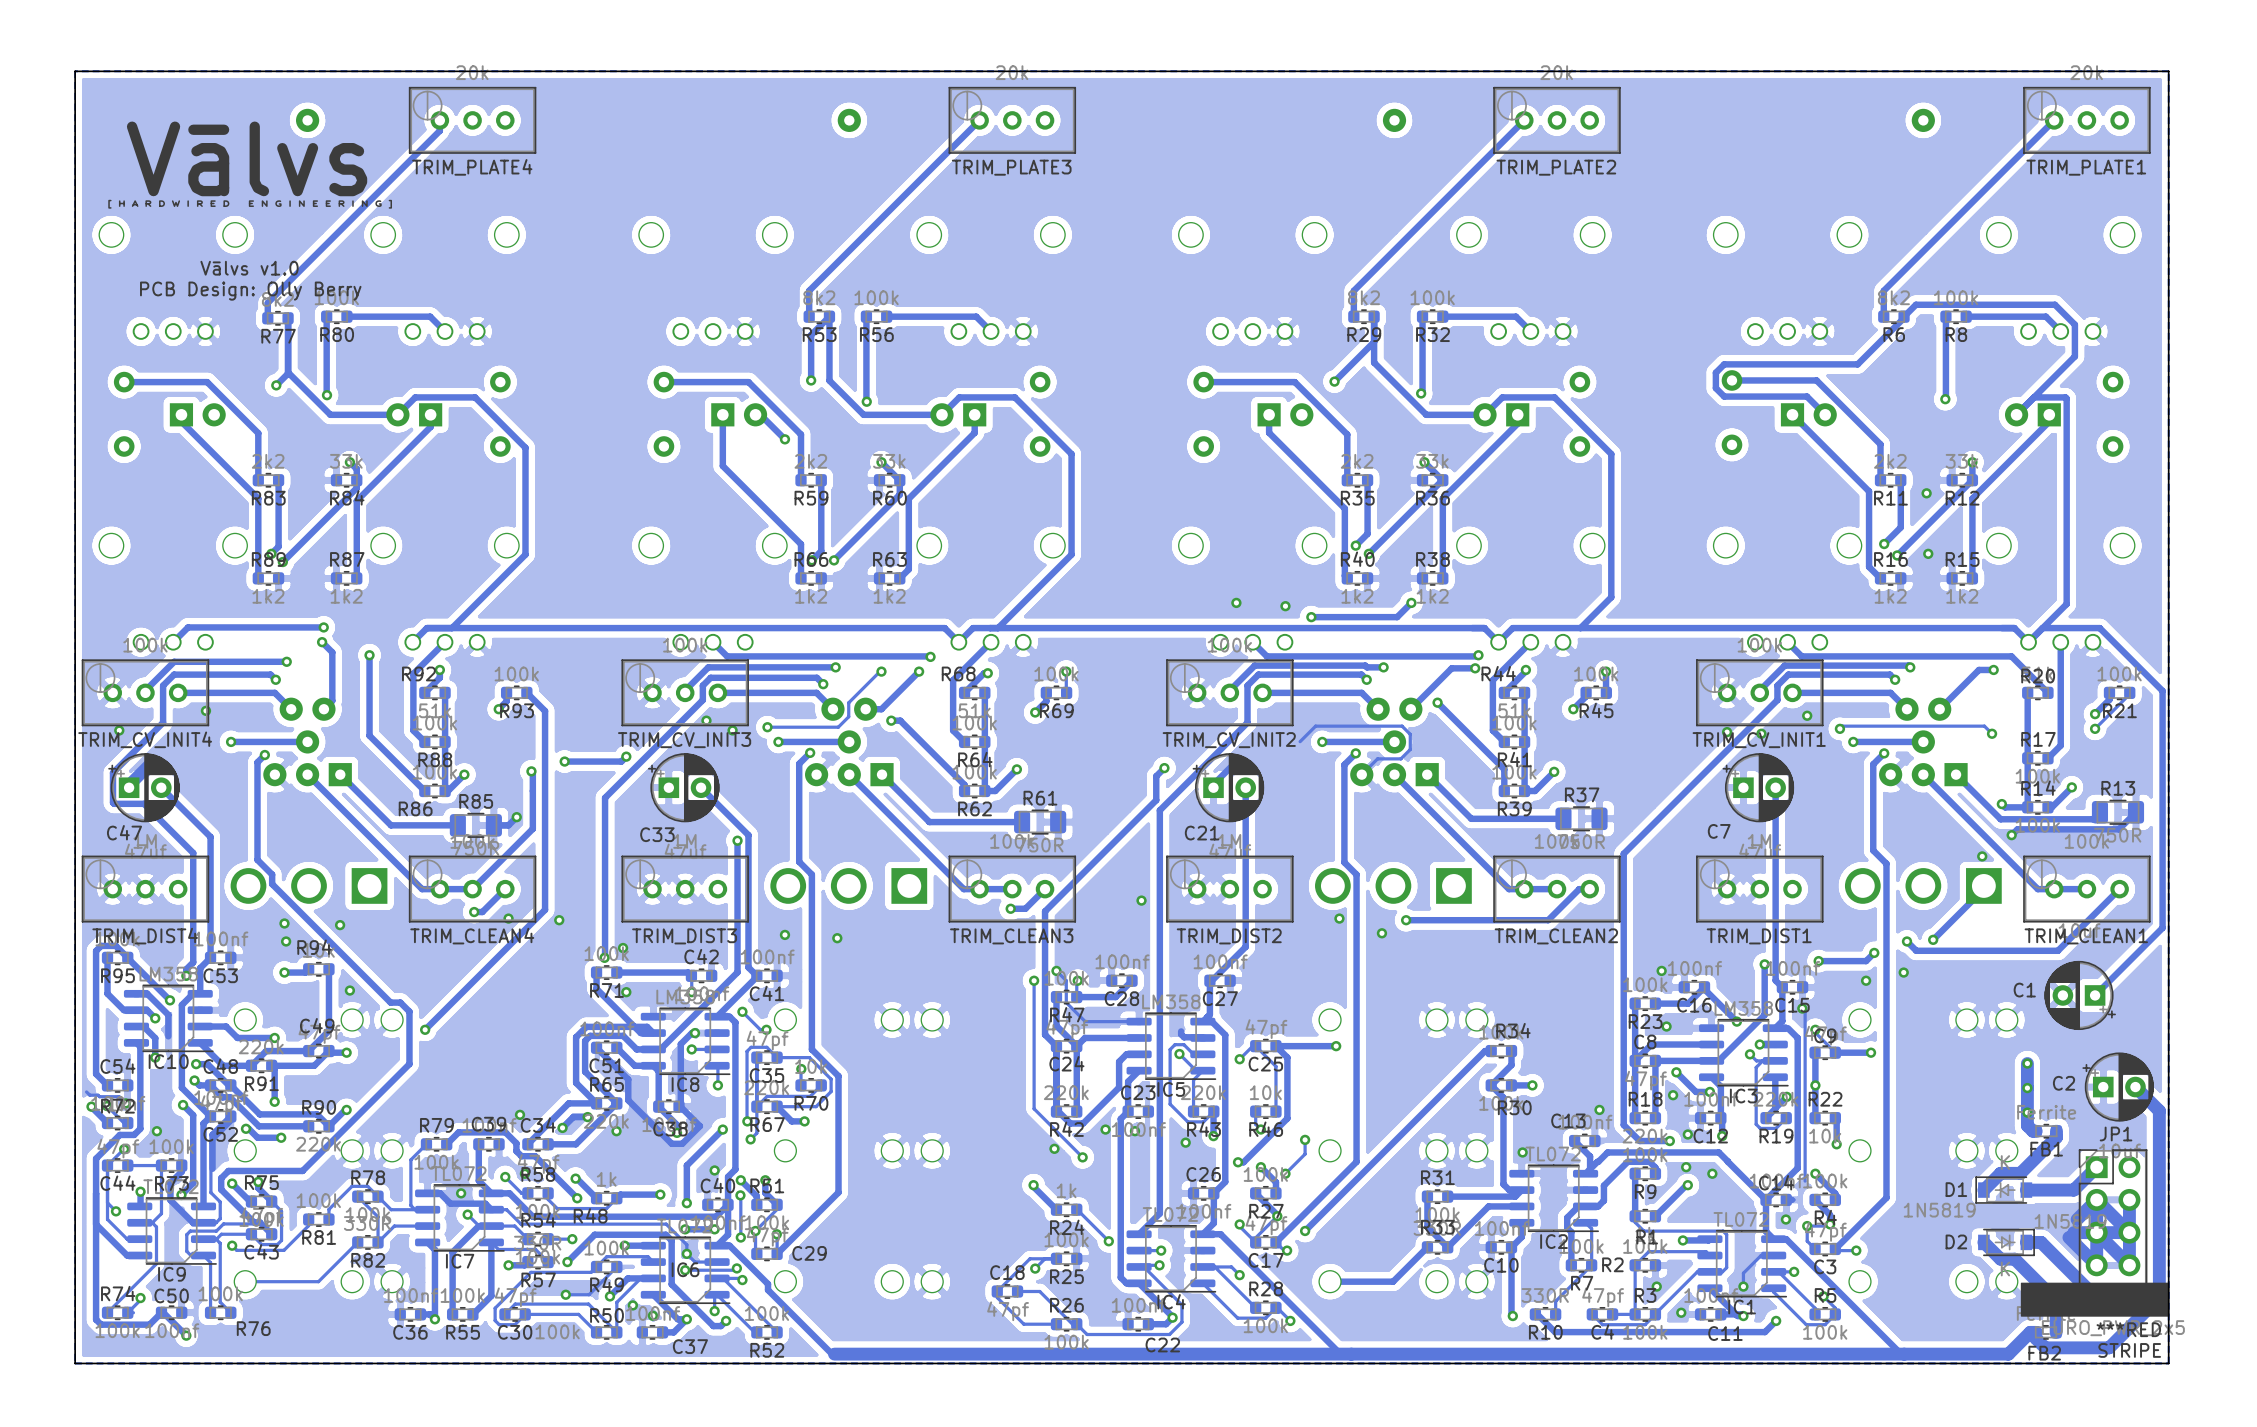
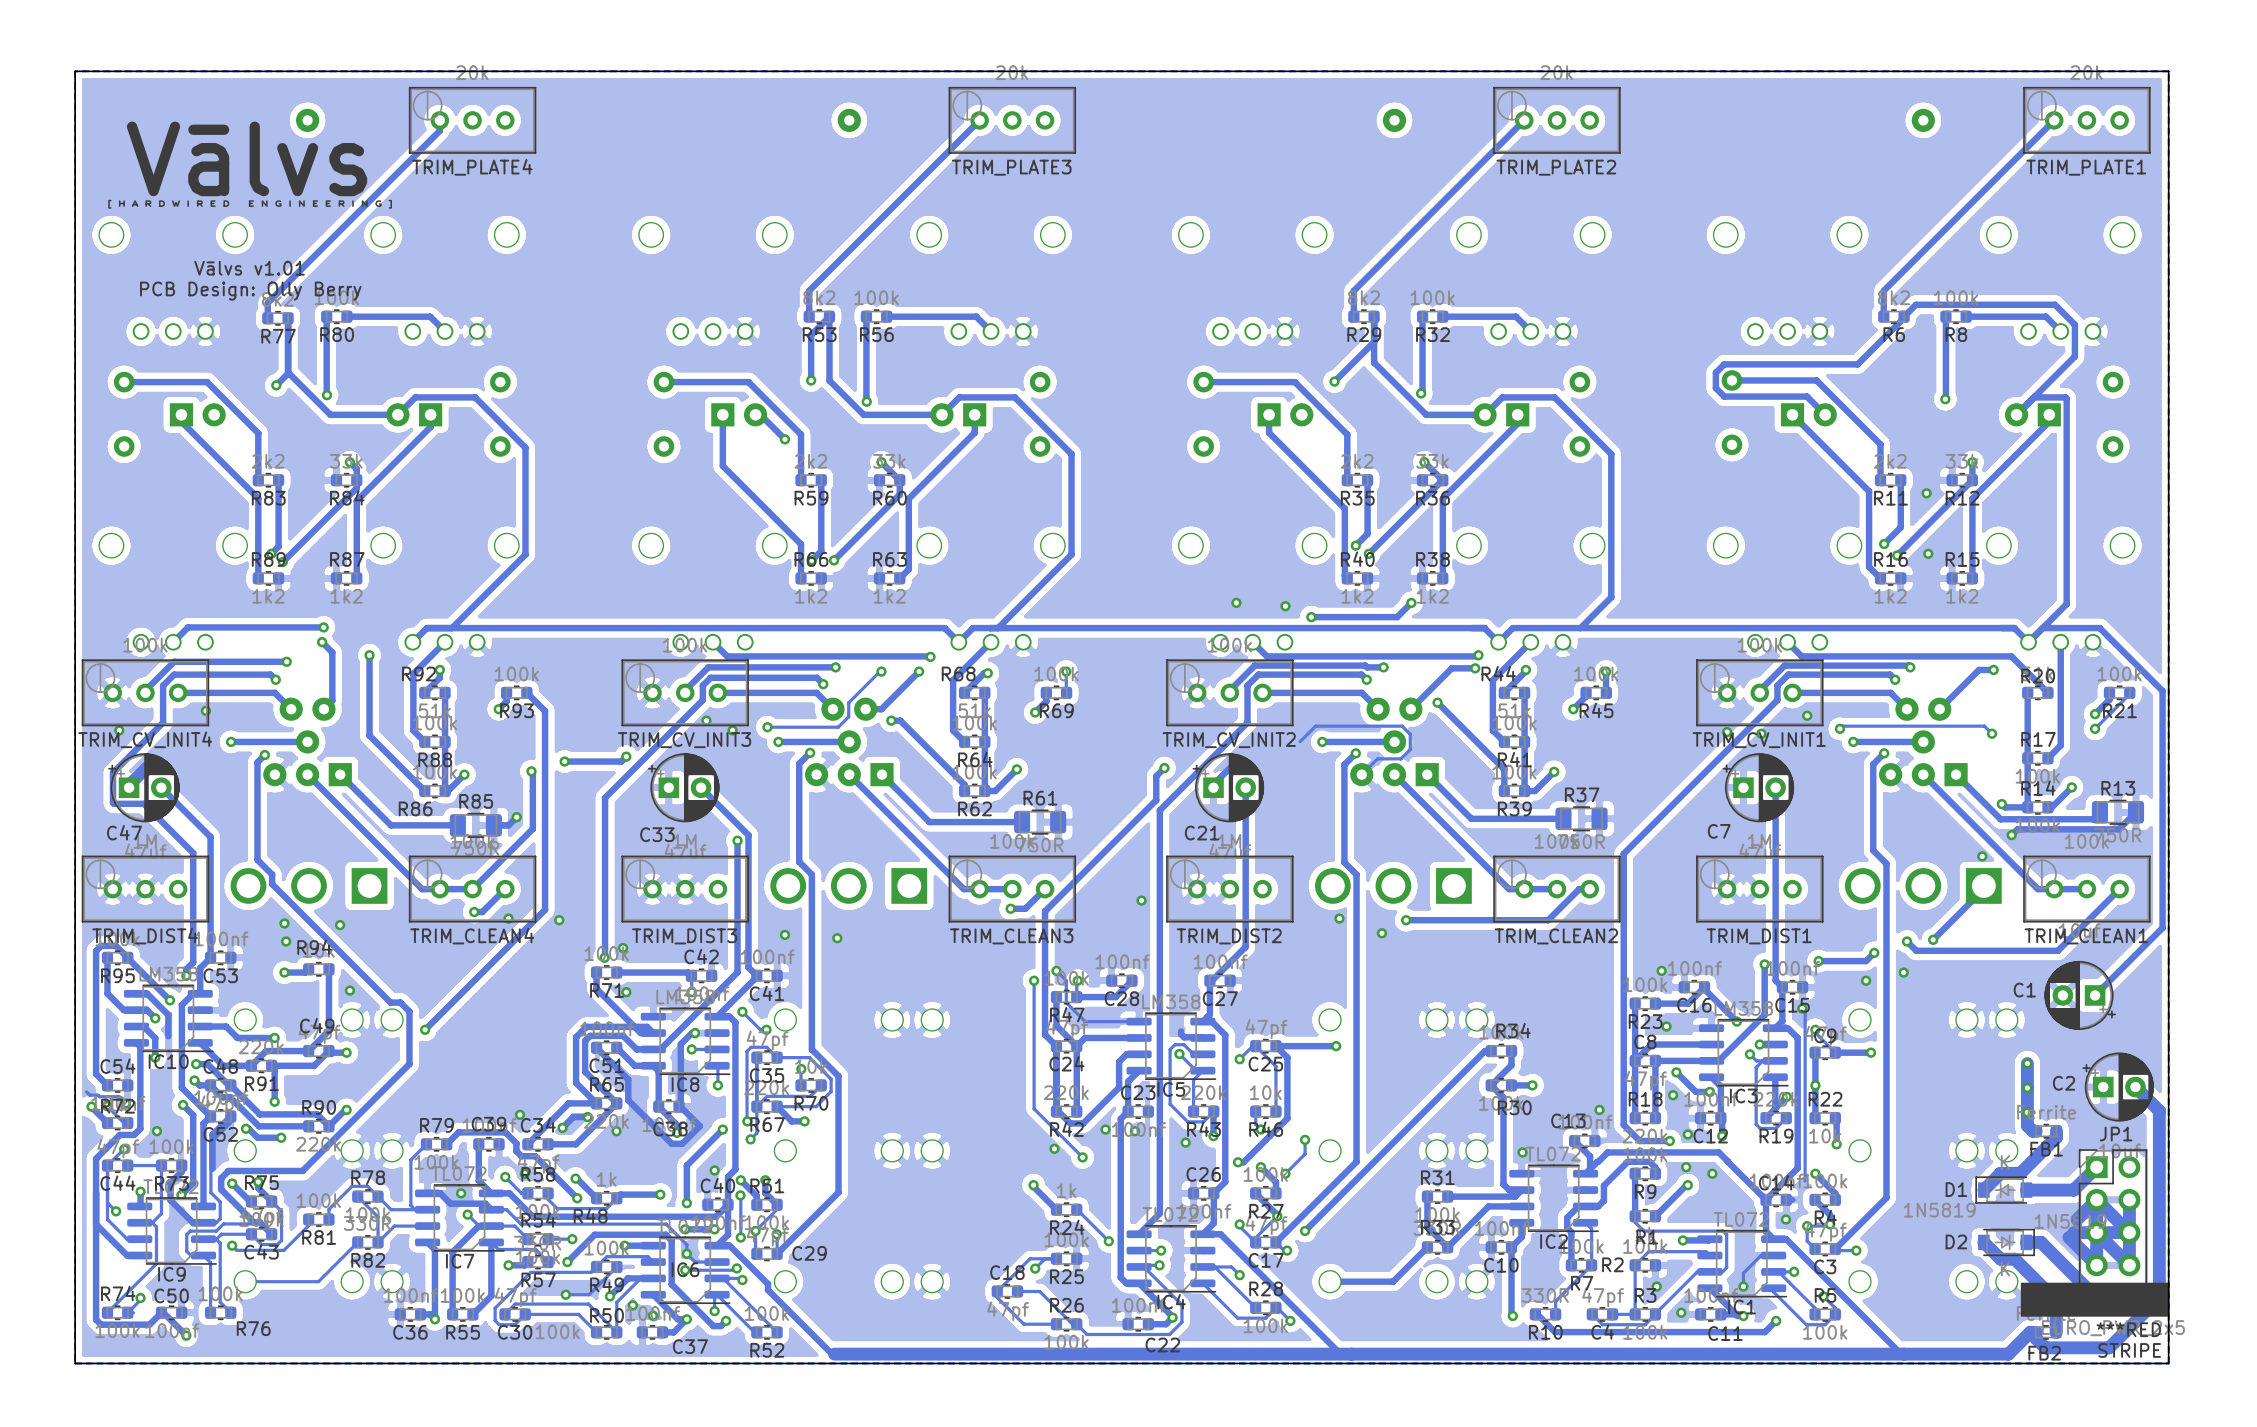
text: Vālvs v1.0 (249, 268) -> Vālvs v1.01 (249, 268)

